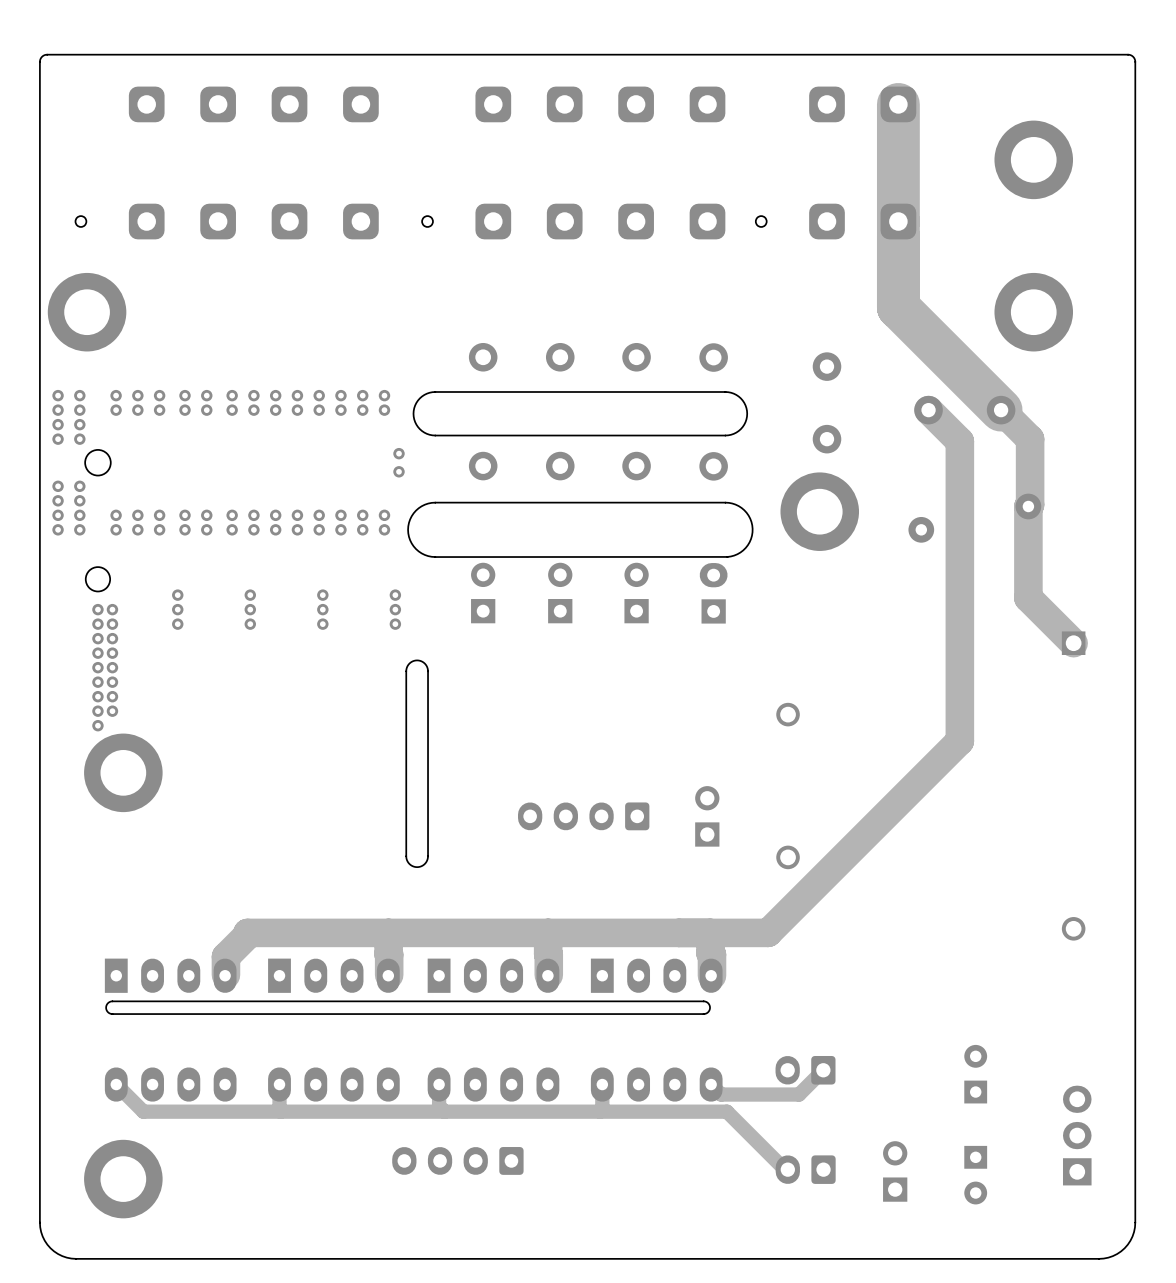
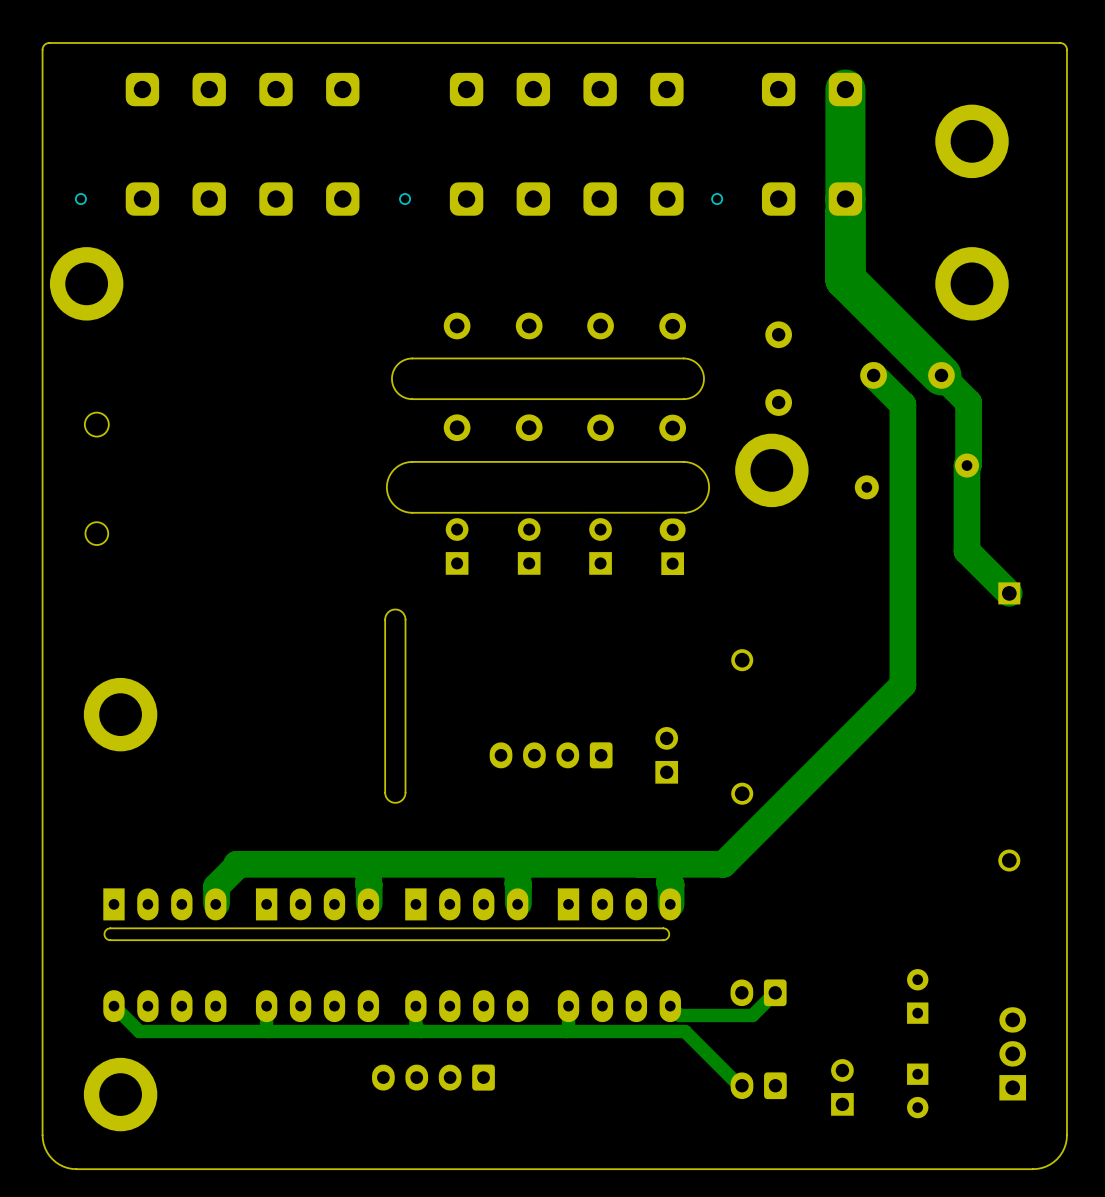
via: (58, 395) -> none
via: (79, 395) -> none
via: (116, 395) -> none
via: (137, 395) -> none
via: (159, 395) -> none
via: (185, 395) -> none
via: (206, 395) -> none
via: (232, 395) -> none
via: (253, 395) -> none
via: (275, 395) -> none
via: (297, 395) -> none
via: (319, 395) -> none
via: (340, 395) -> none
via: (362, 395) -> none
via: (384, 395) -> none
via: (58, 410) -> none
via: (79, 410) -> none
via: (116, 410) -> none
via: (137, 410) -> none
via: (159, 410) -> none
via: (185, 410) -> none
via: (206, 410) -> none
via: (232, 410) -> none
via: (253, 410) -> none
via: (275, 410) -> none
via: (297, 410) -> none
via: (319, 410) -> none
via: (340, 410) -> none
via: (362, 410) -> none
via: (384, 410) -> none
via: (58, 424) -> none
via: (79, 424) -> none
via: (58, 439) -> none
via: (79, 439) -> none
via: (399, 453) -> none
via: (399, 471) -> none
via: (58, 486) -> none
via: (79, 486) -> none
via: (58, 500) -> none
via: (79, 500) -> none
via: (58, 515) -> none
via: (79, 515) -> none
via: (116, 515) -> none
via: (137, 515) -> none
via: (159, 515) -> none
via: (185, 515) -> none
via: (206, 515) -> none
via: (232, 515) -> none
via: (253, 515) -> none
via: (275, 515) -> none
via: (297, 515) -> none
via: (319, 515) -> none
via: (340, 515) -> none
via: (362, 515) -> none
via: (384, 515) -> none
via: (58, 529) -> none
via: (79, 529) -> none
via: (116, 529) -> none
via: (137, 529) -> none
via: (159, 529) -> none
via: (185, 529) -> none
via: (206, 529) -> none
via: (232, 529) -> none
via: (253, 529) -> none
via: (275, 529) -> none
via: (297, 529) -> none
via: (319, 529) -> none
via: (340, 529) -> none
via: (362, 529) -> none
via: (384, 529) -> none
via: (177, 595) -> none
via: (250, 595) -> none
via: (322, 595) -> none
via: (395, 595) -> none
via: (97, 609) -> none
via: (112, 609) -> none
via: (177, 609) -> none
via: (250, 609) -> none
via: (322, 609) -> none
via: (395, 609) -> none
via: (97, 624) -> none
via: (112, 624) -> none
via: (177, 624) -> none
via: (250, 624) -> none
via: (322, 624) -> none
via: (395, 624) -> none
via: (97, 638) -> none
via: (112, 638) -> none
via: (97, 653) -> none
via: (112, 653) -> none
via: (97, 667) -> none
via: (112, 667) -> none
via: (97, 682) -> none
via: (112, 682) -> none
via: (97, 696) -> none
via: (112, 696) -> none
via: (97, 711) -> none
via: (112, 711) -> none
via: (97, 725) -> none

